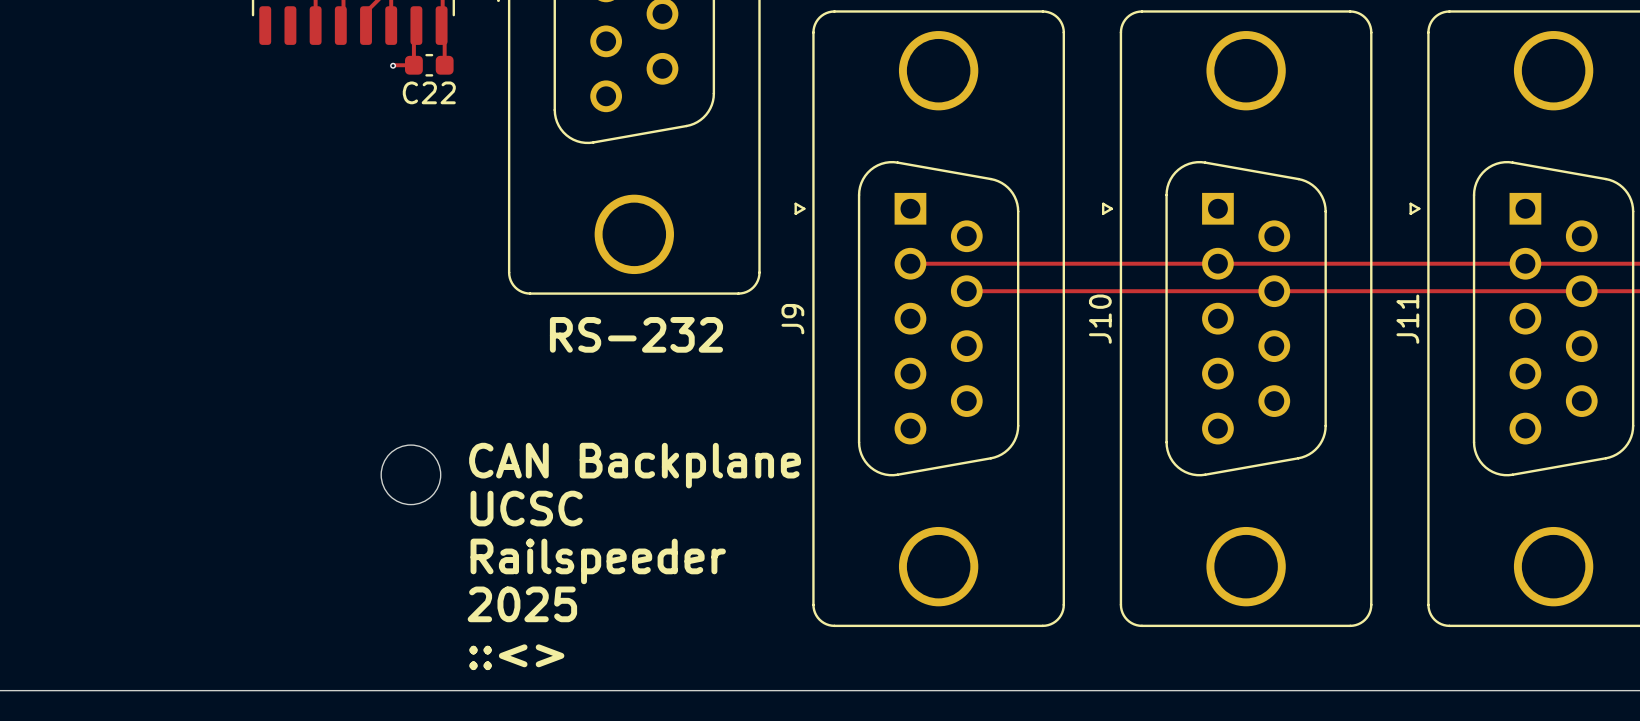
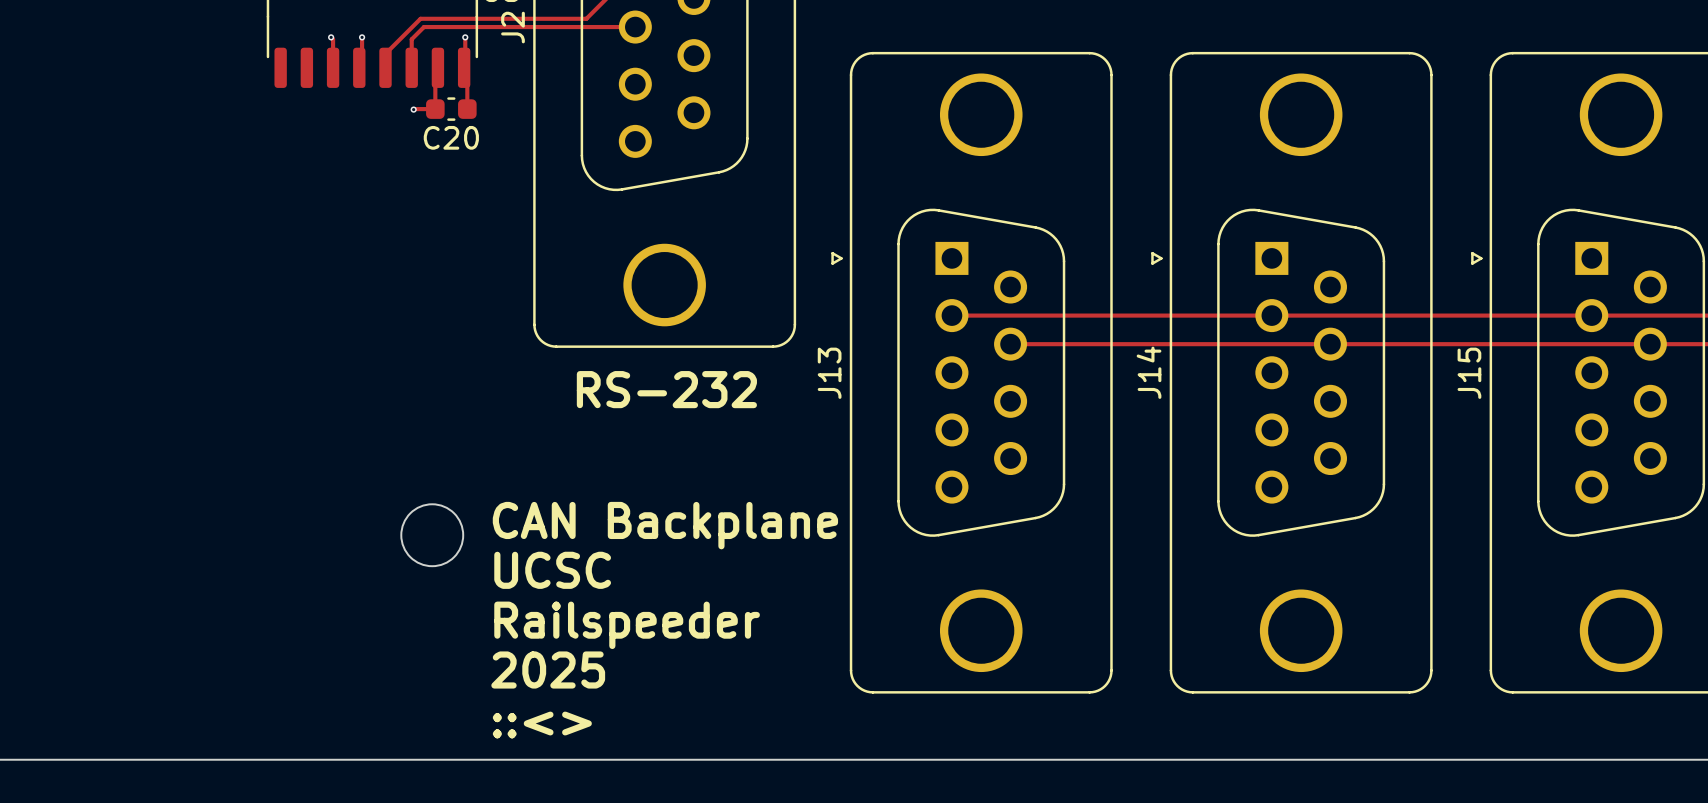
C22 name: C22 (429, 92) -> C20 (451, 137)
J9 name: J9 (792, 319) -> J13 (829, 373)
J10 name: J10 (1100, 319) -> J14 (1149, 372)
J11 name: J11 (1407, 319) -> J15 (1469, 373)

